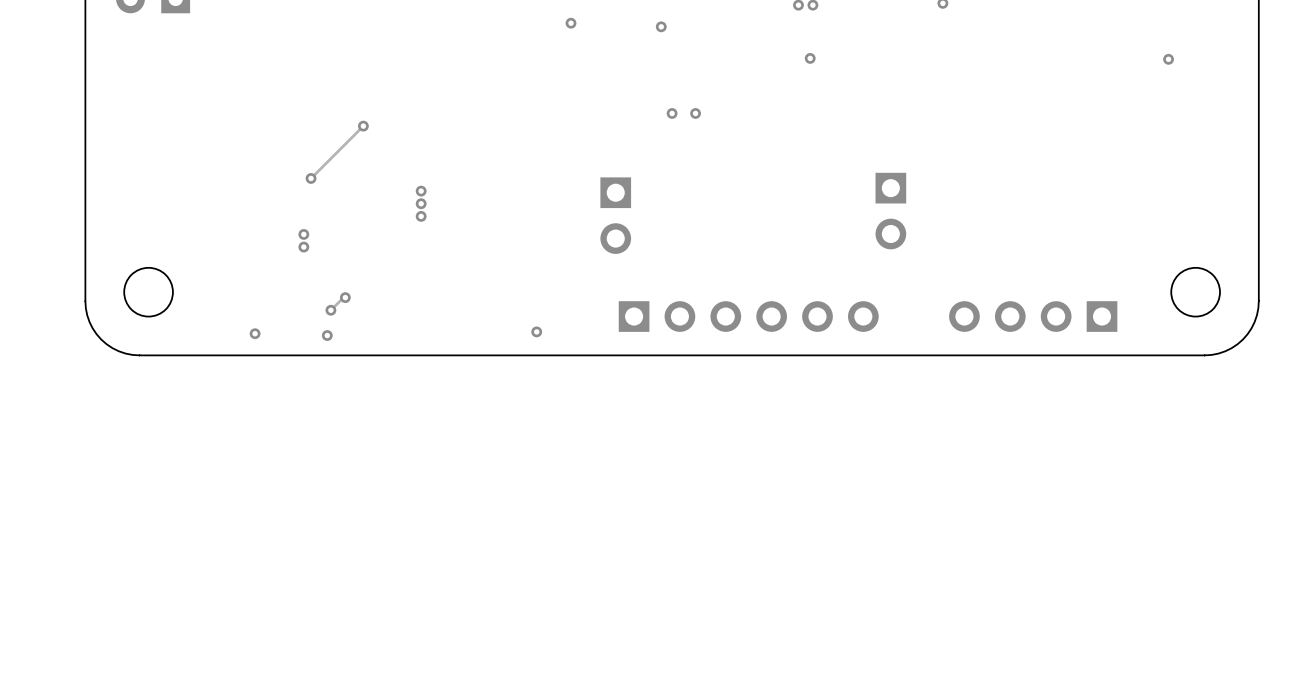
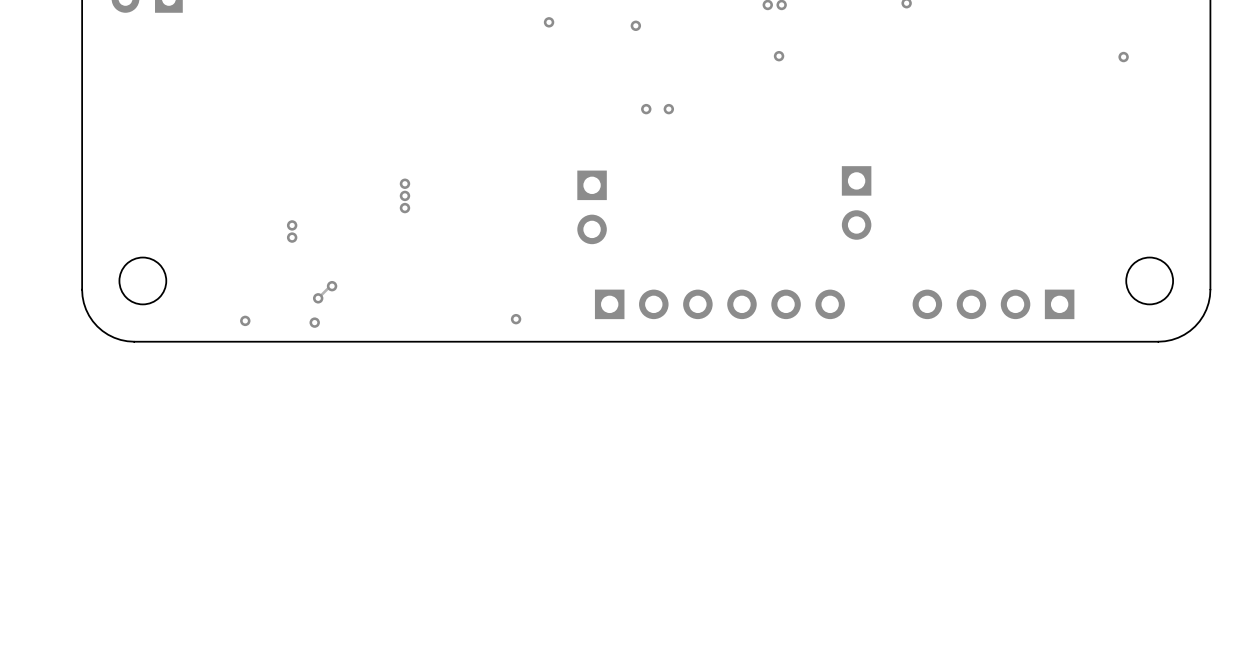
track: (363, 126) (311, 178) -> none
via: (363, 126) -> none
via: (311, 178) -> none

